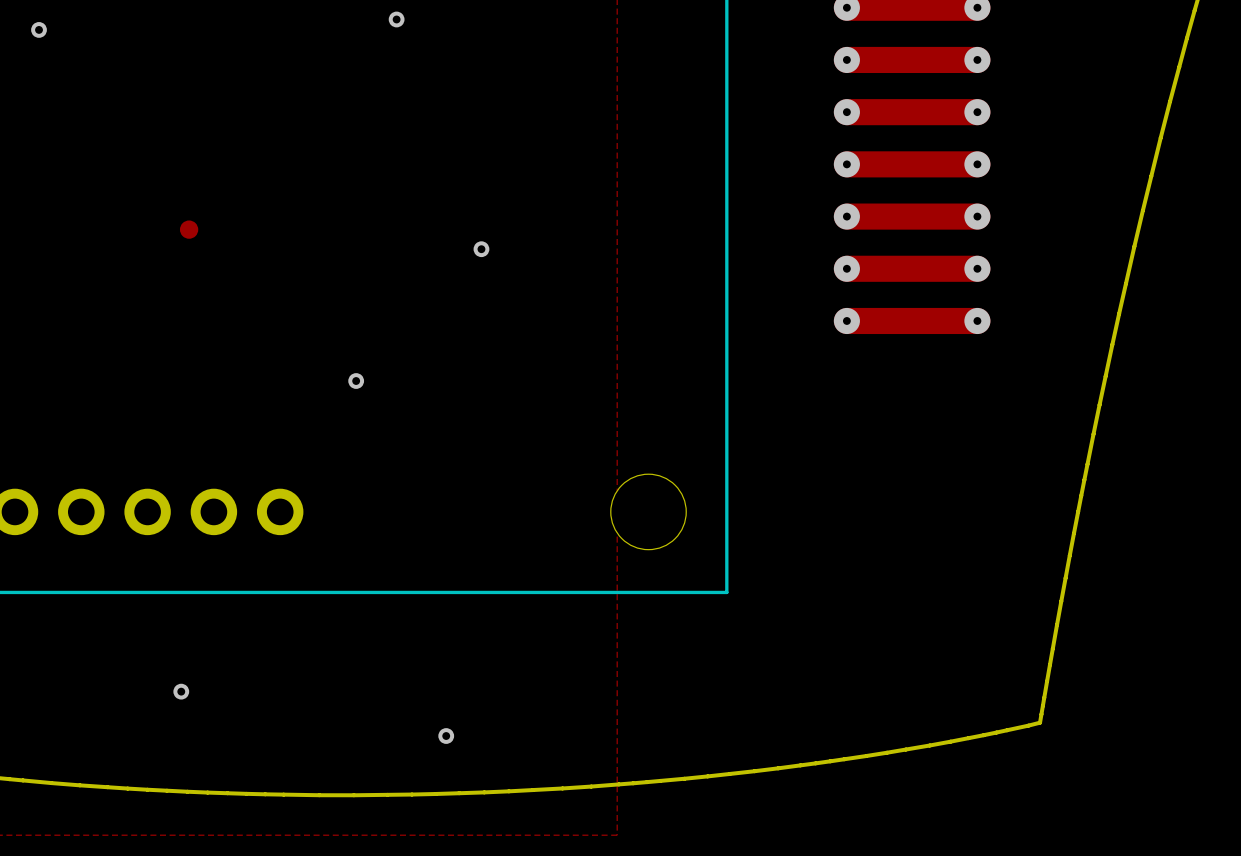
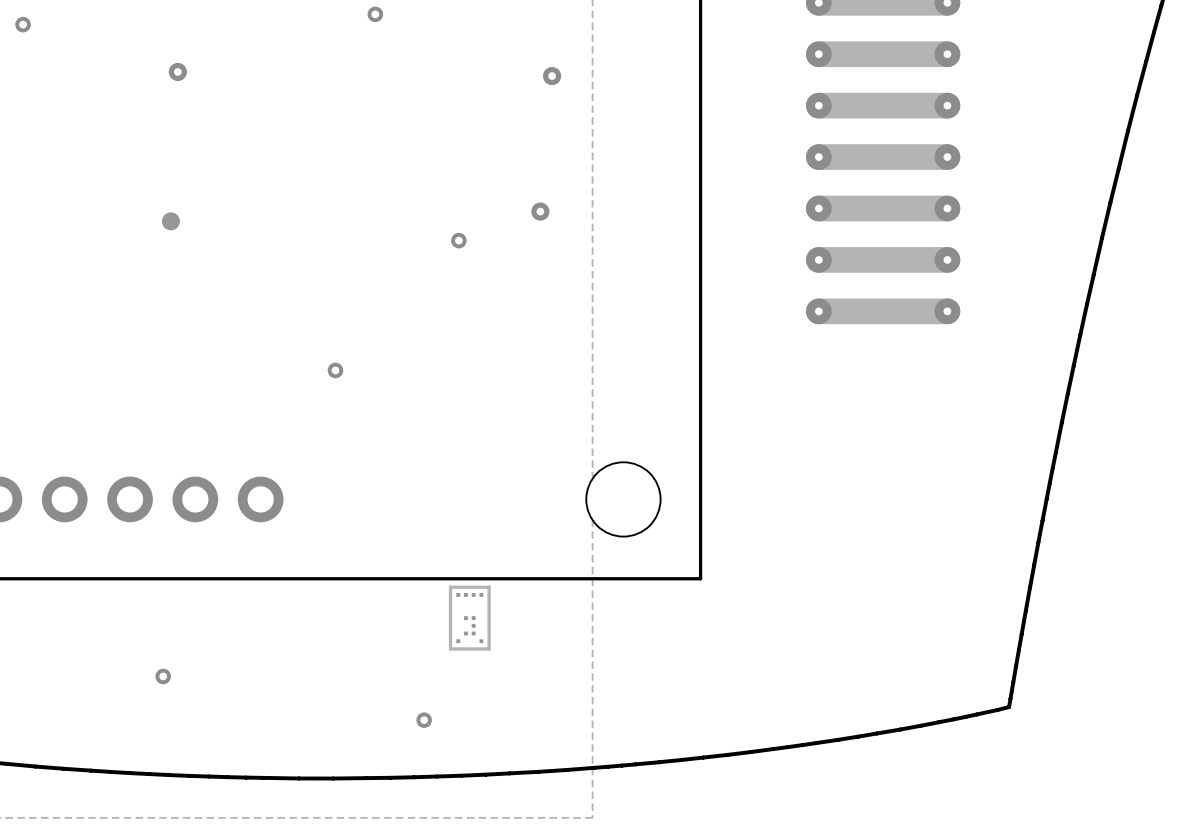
via: none -> (177, 71)
via: none -> (552, 76)
via: none -> (540, 211)
part: none -> (469, 618)

